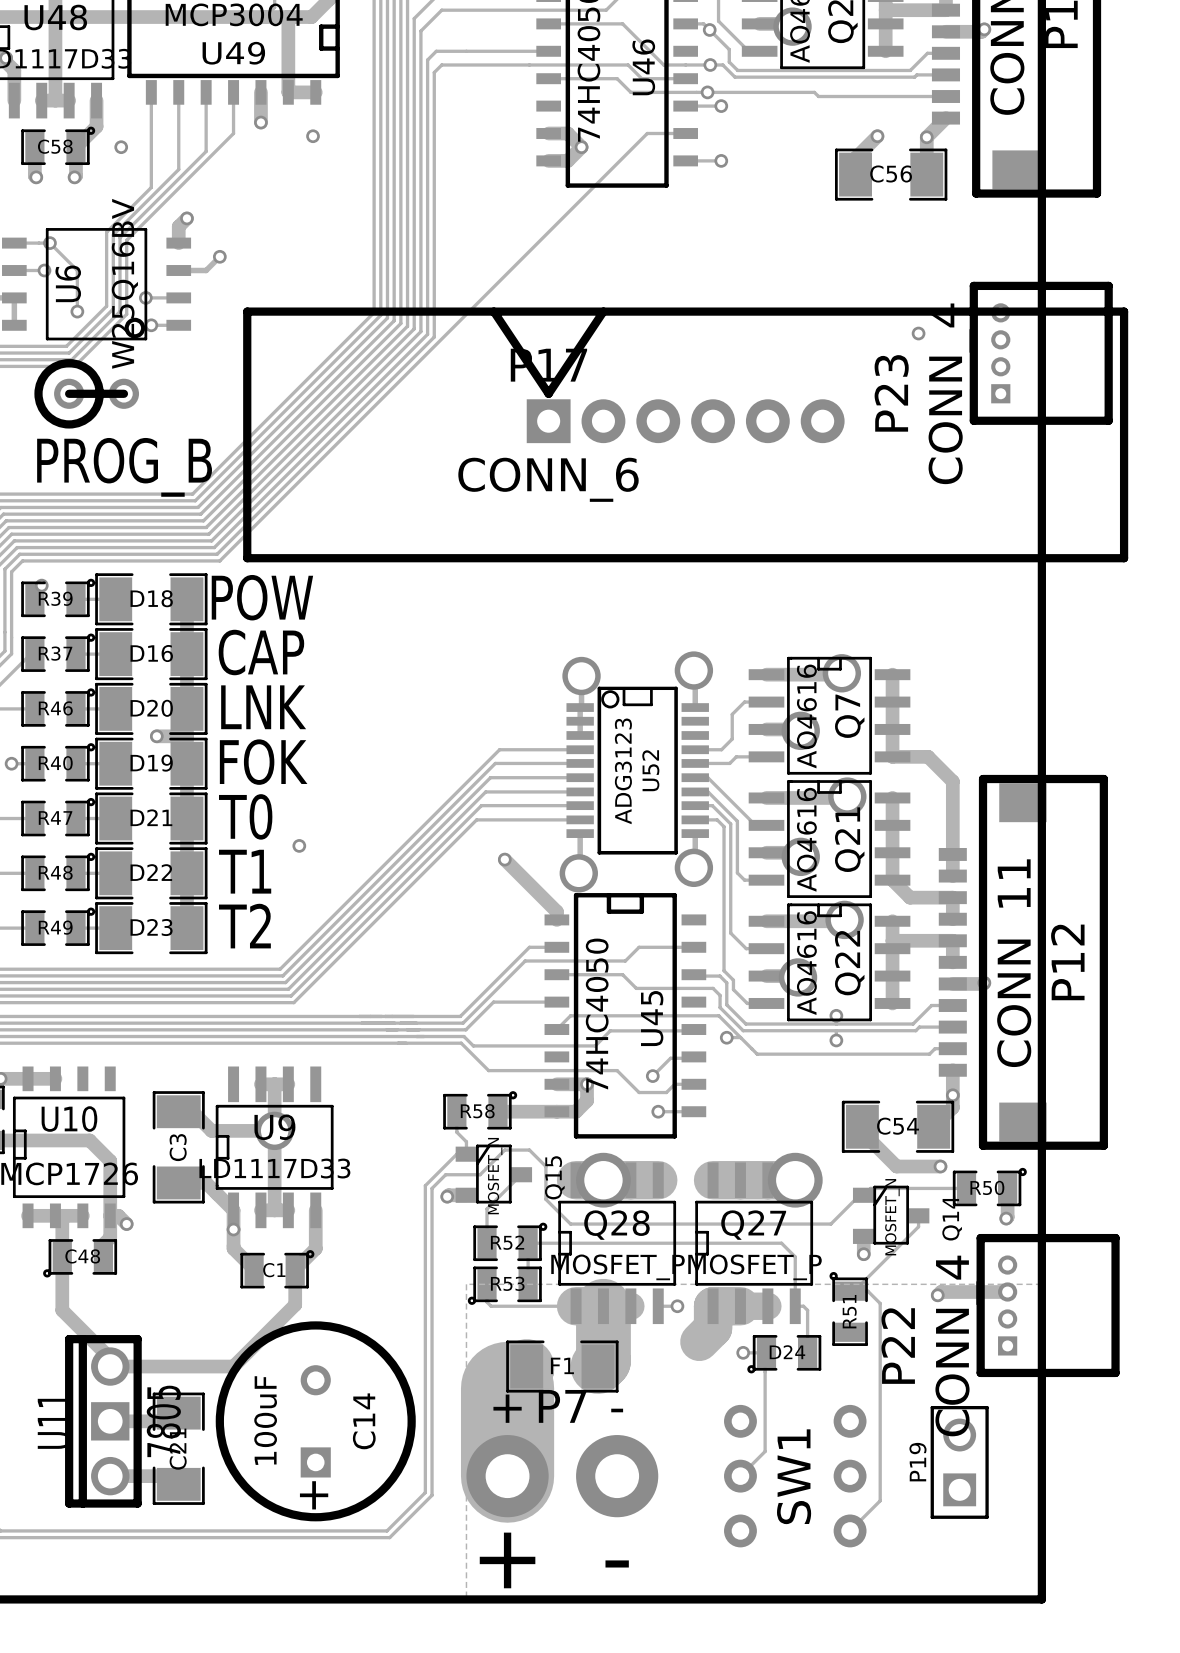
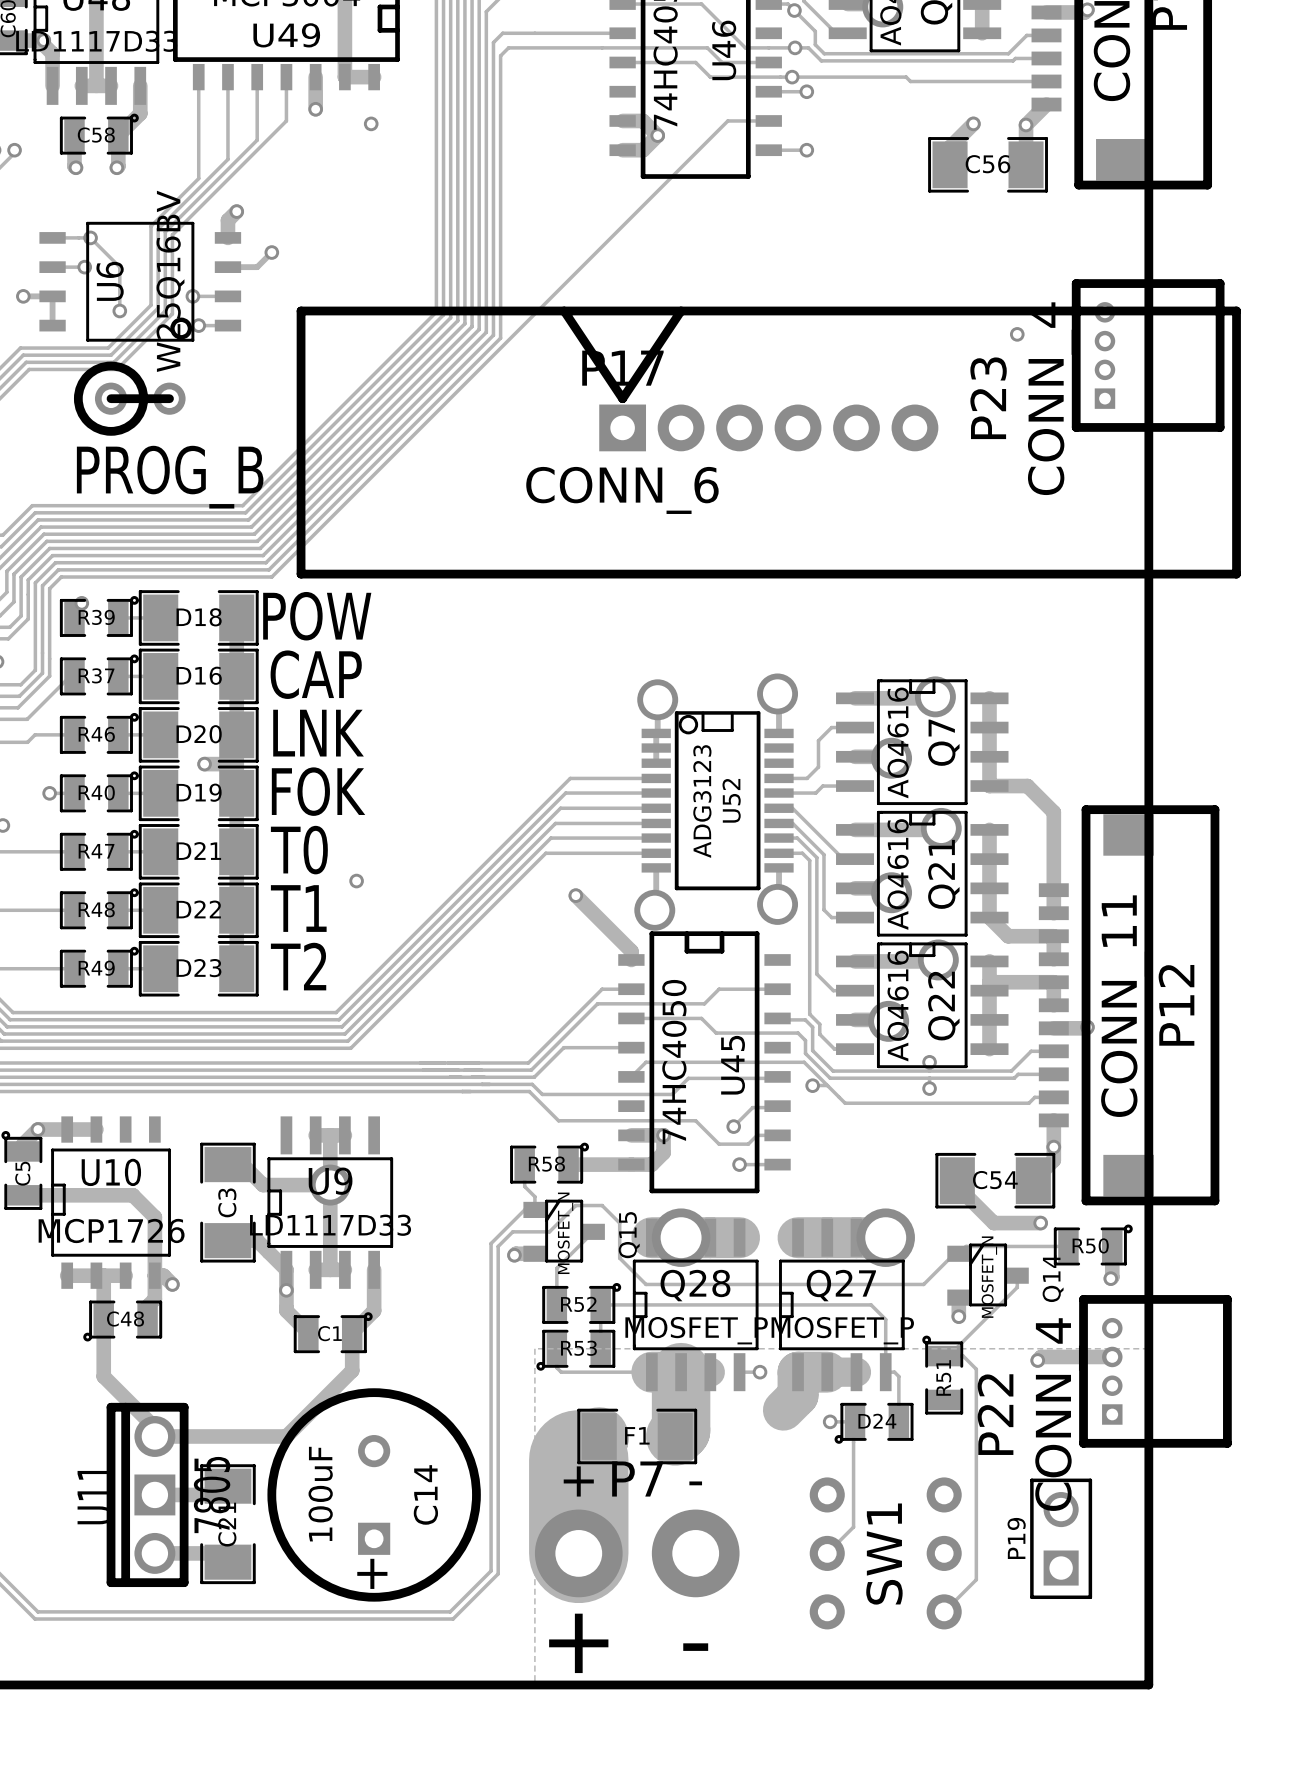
via: (121, 147) -> none

